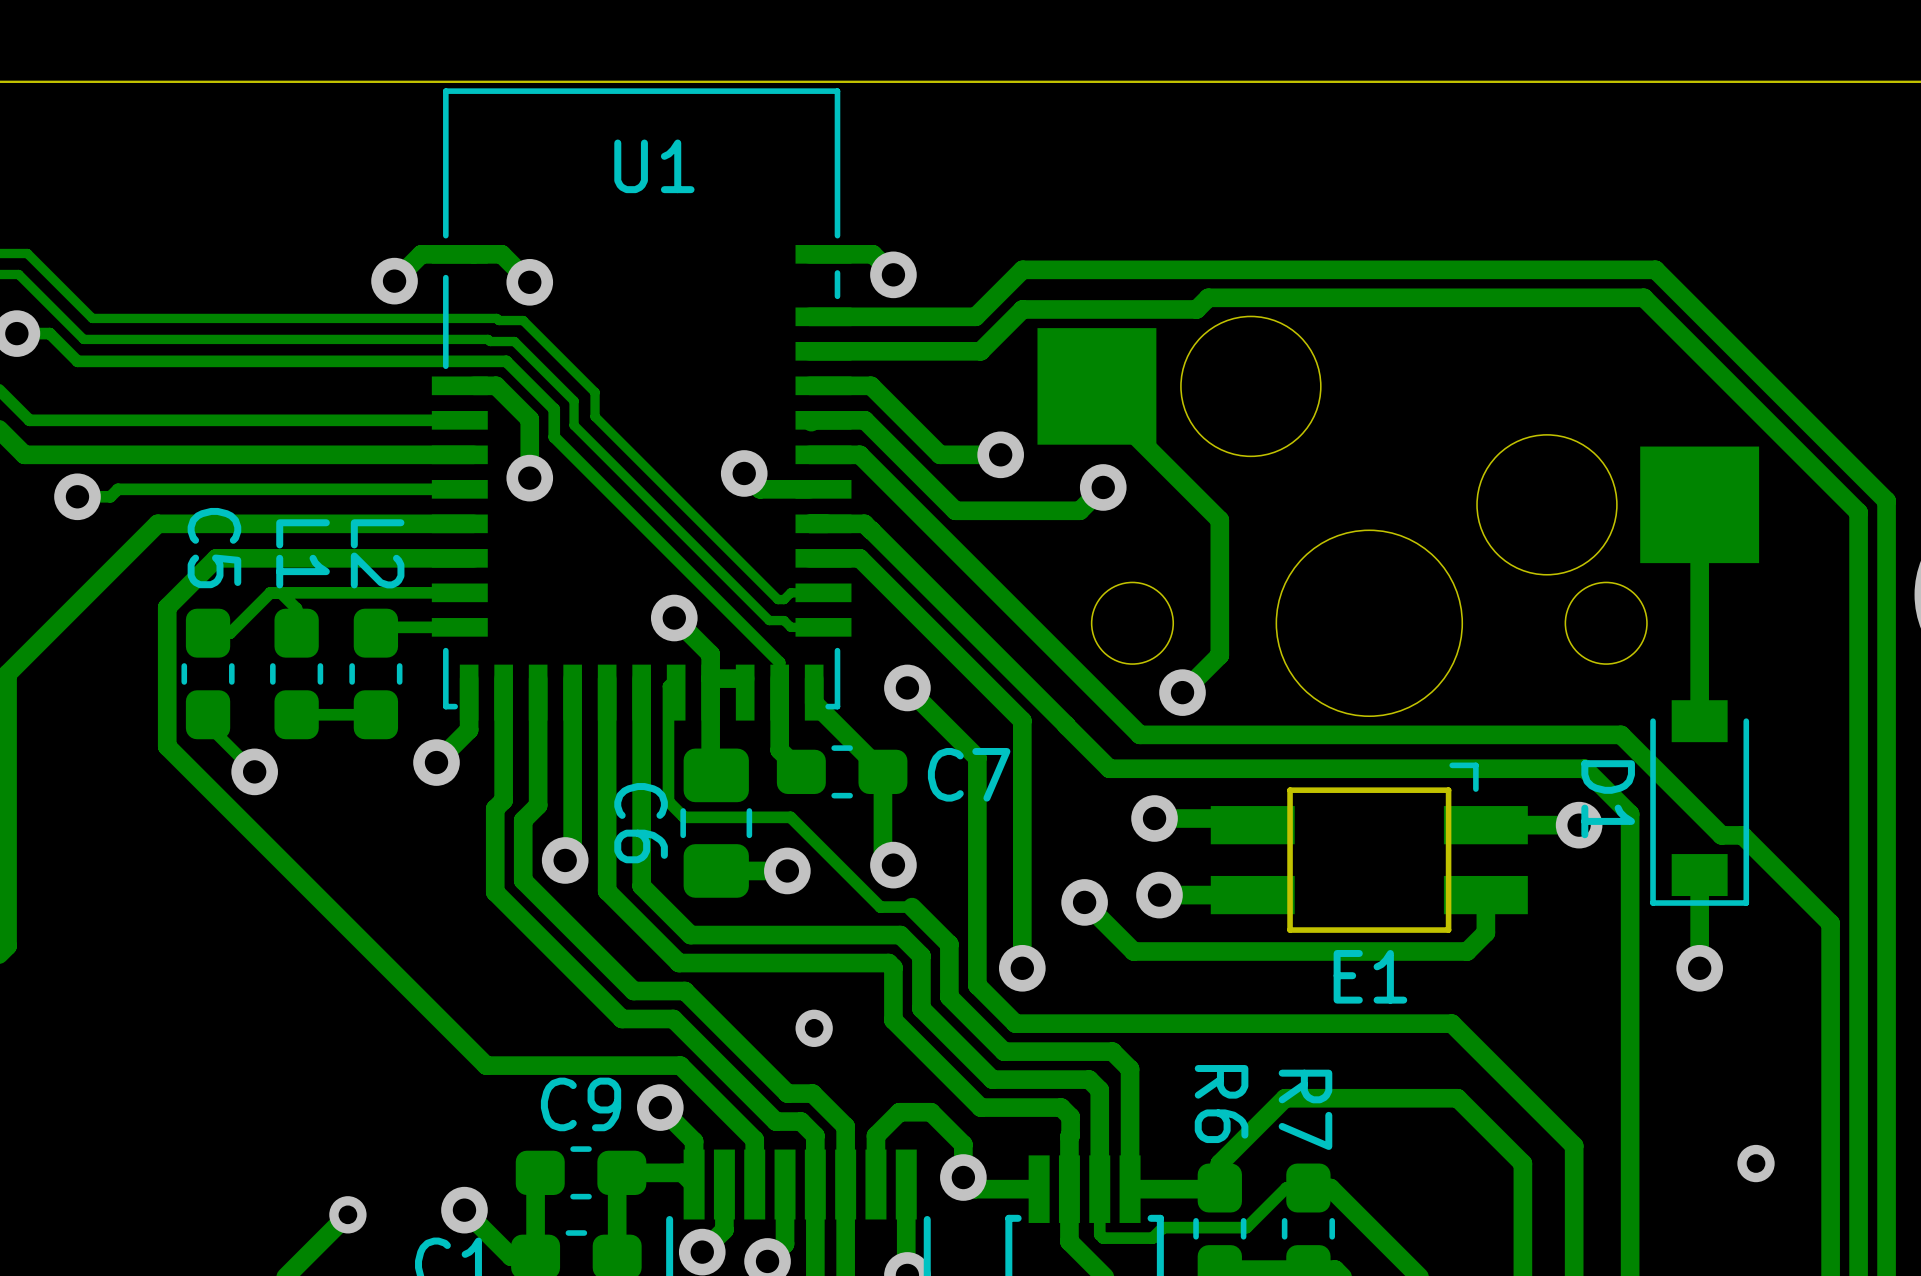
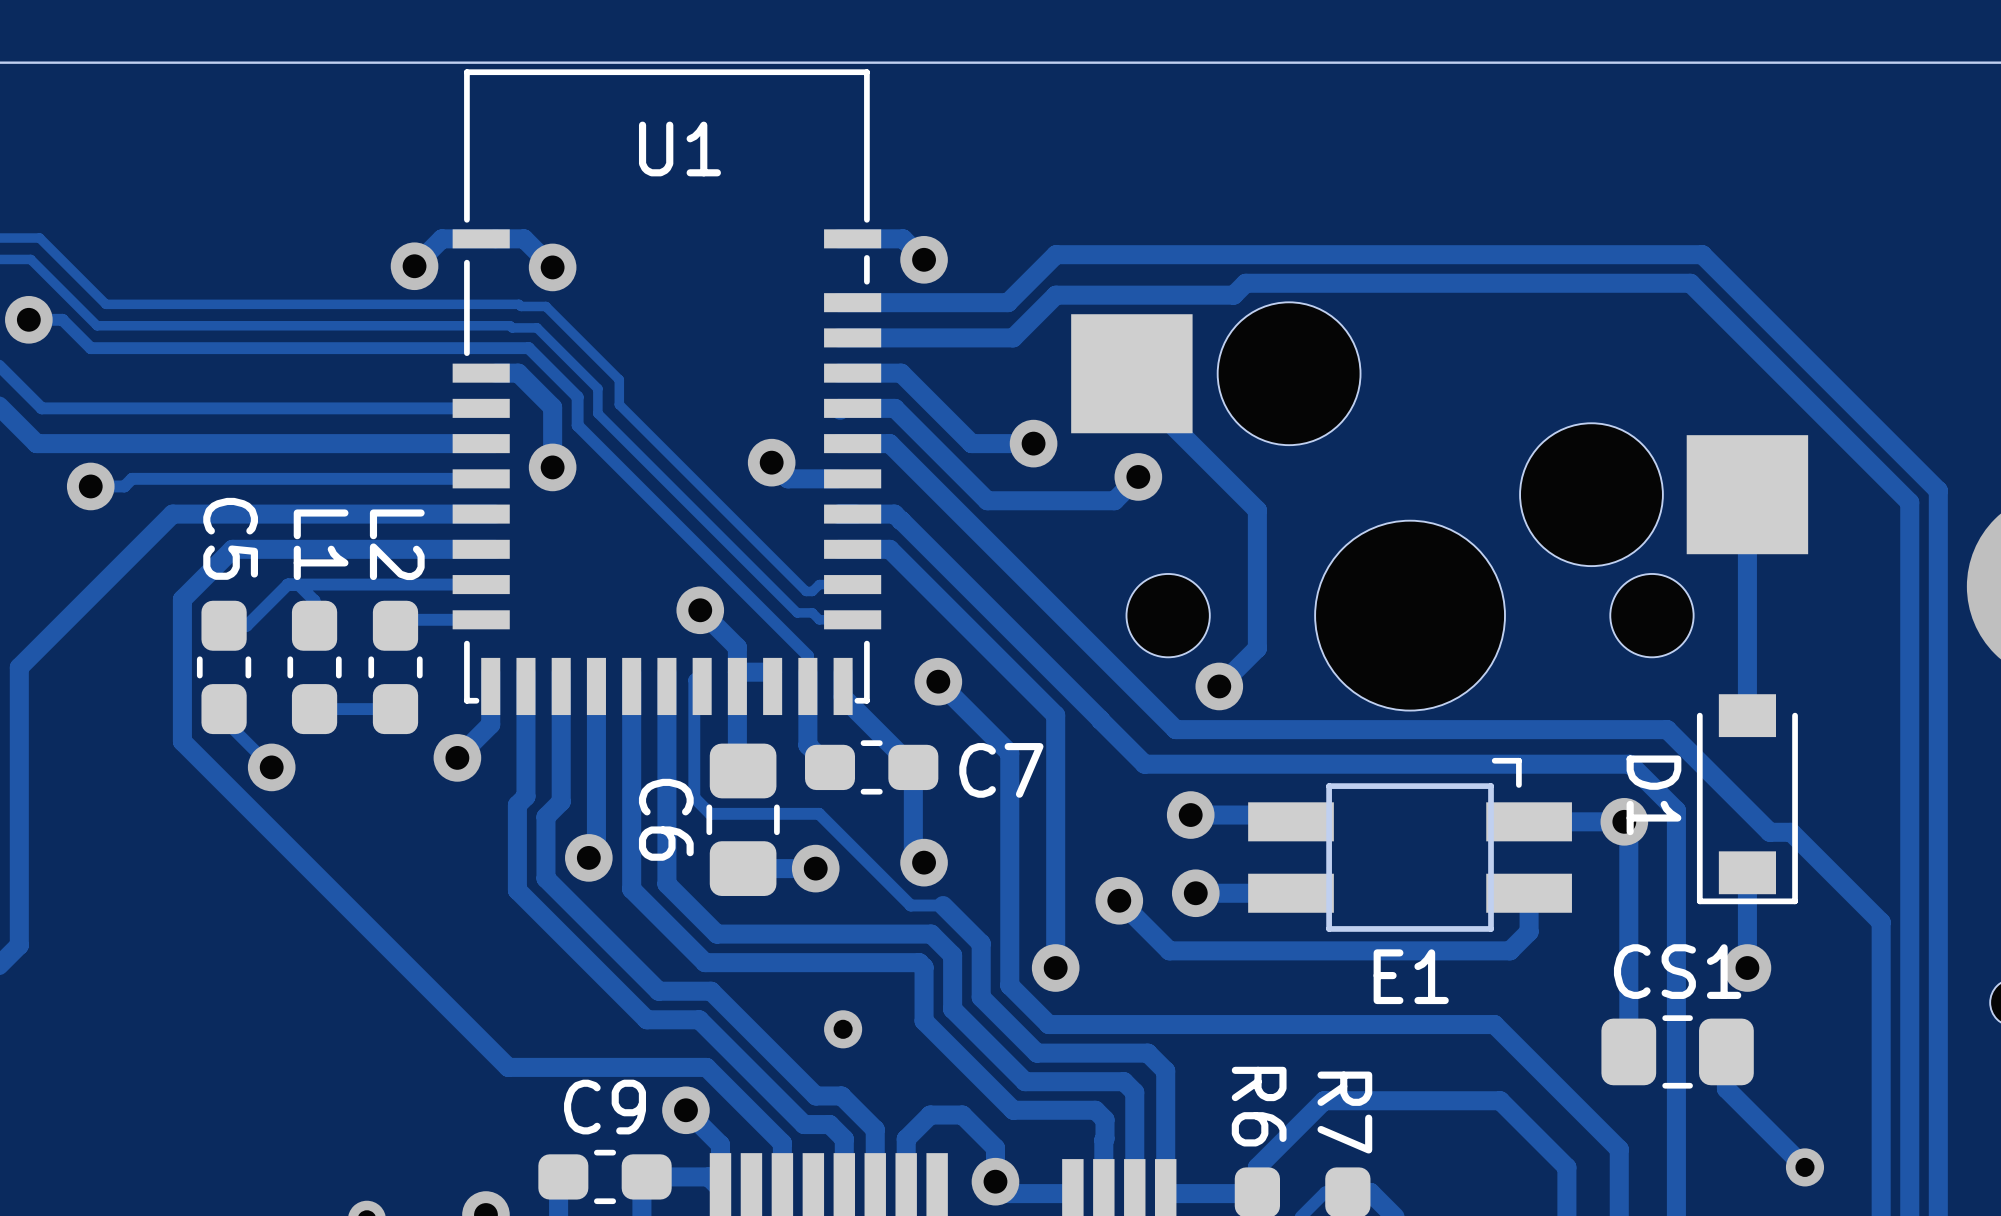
track: none -> (1624, 821) (1628, 826) (1628, 1051)
CS1: none -> (1677, 1051)
track: none -> (1726, 1051) (1726, 1088) (1804, 1167)

